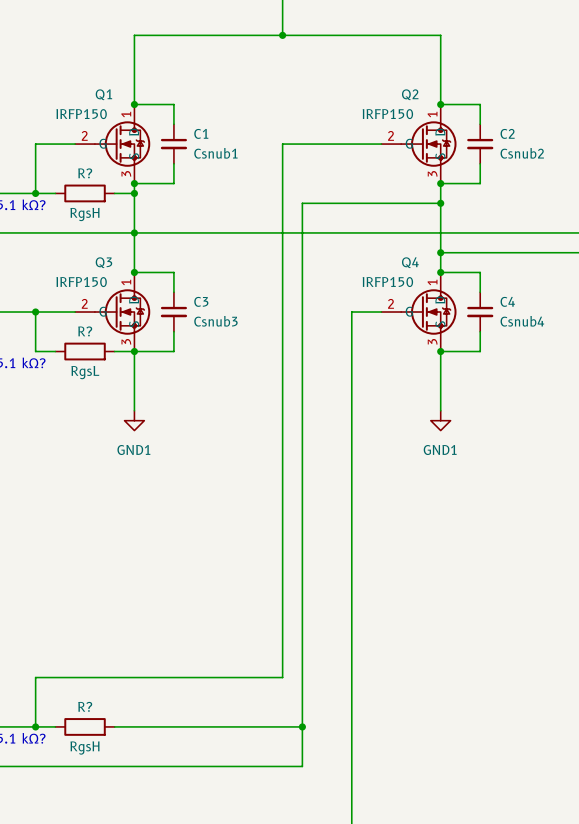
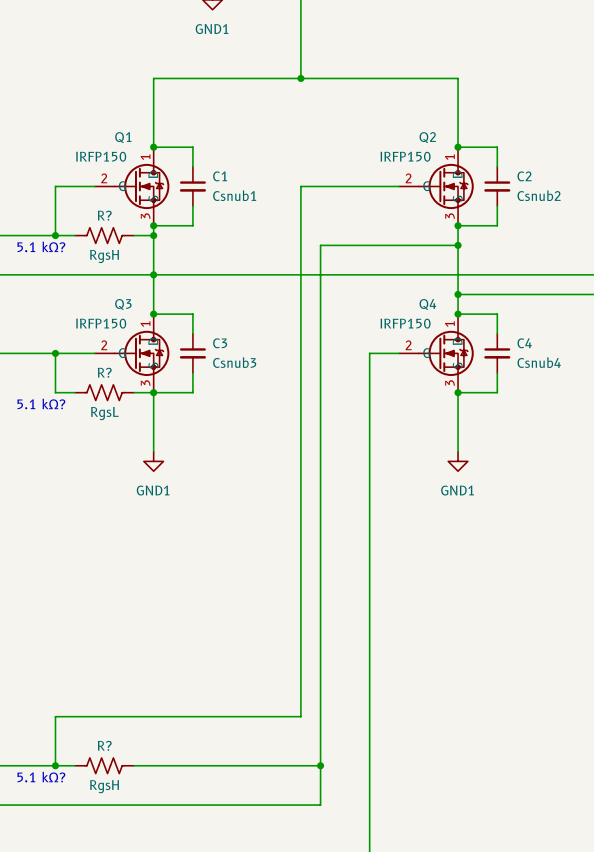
R? symbol: [55, 184, 115, 203] -> [75, 227, 135, 244]
R? symbol: [55, 342, 115, 361] -> [75, 384, 135, 401]
R? symbol: [55, 718, 115, 736] -> [75, 757, 135, 774]

